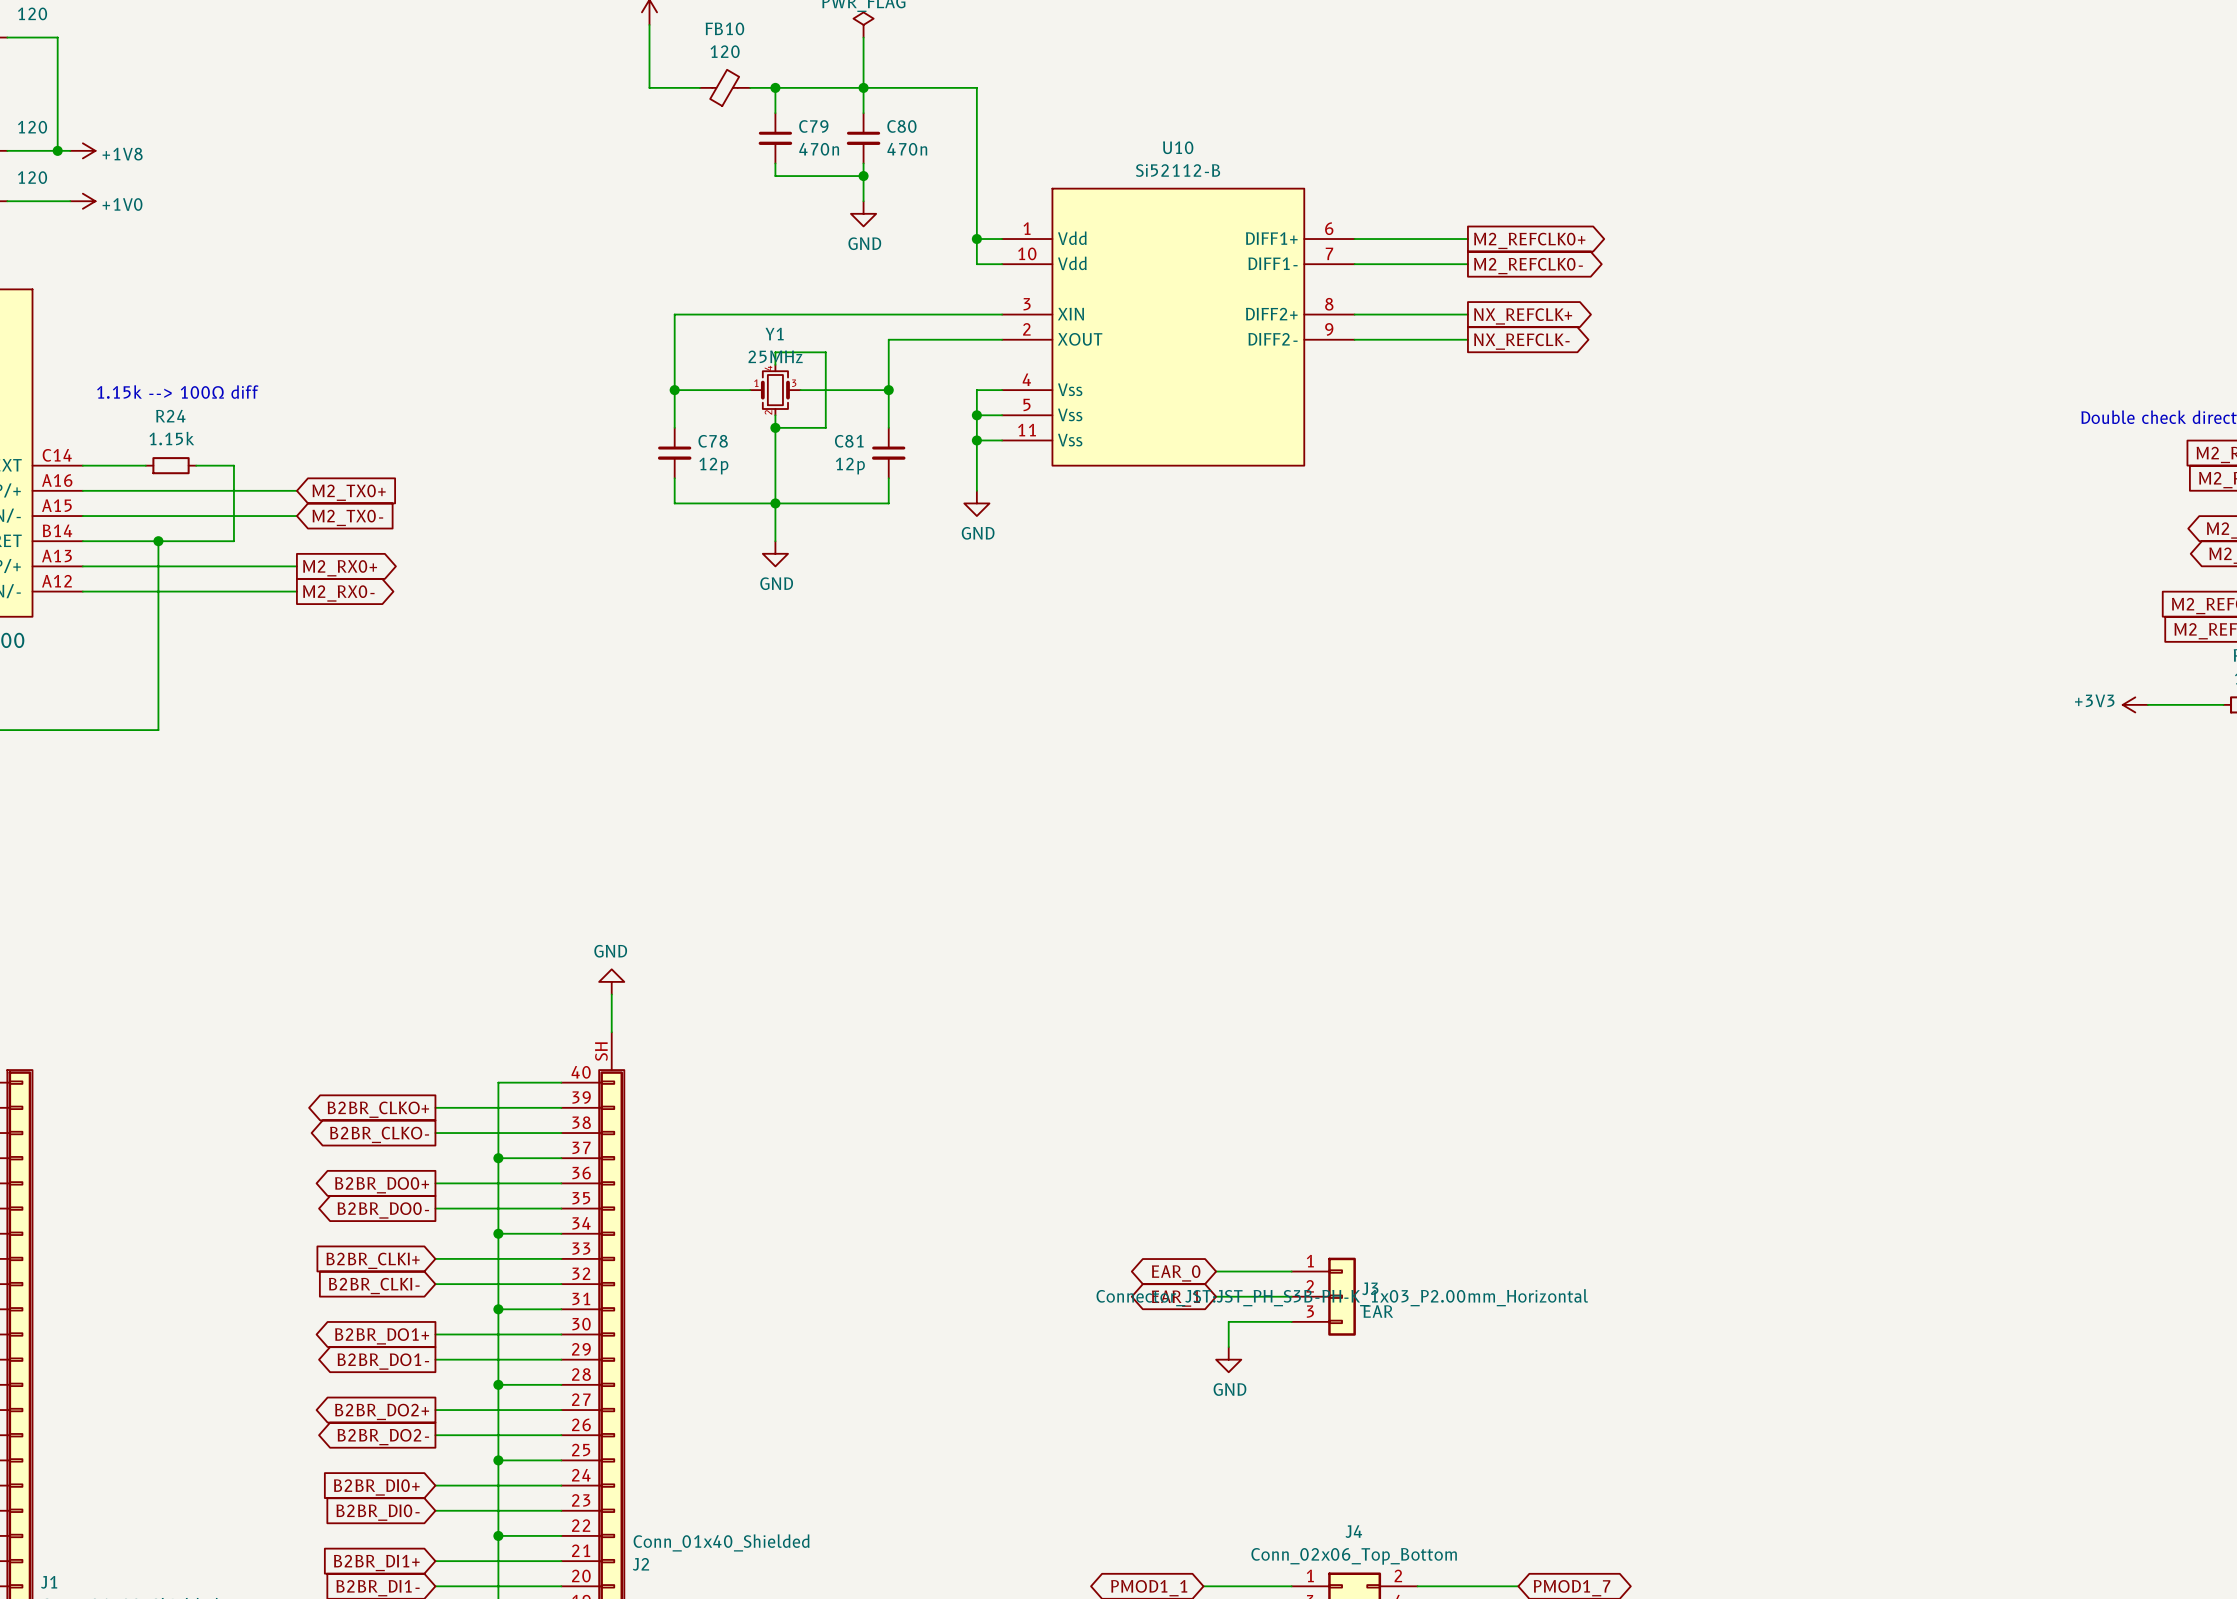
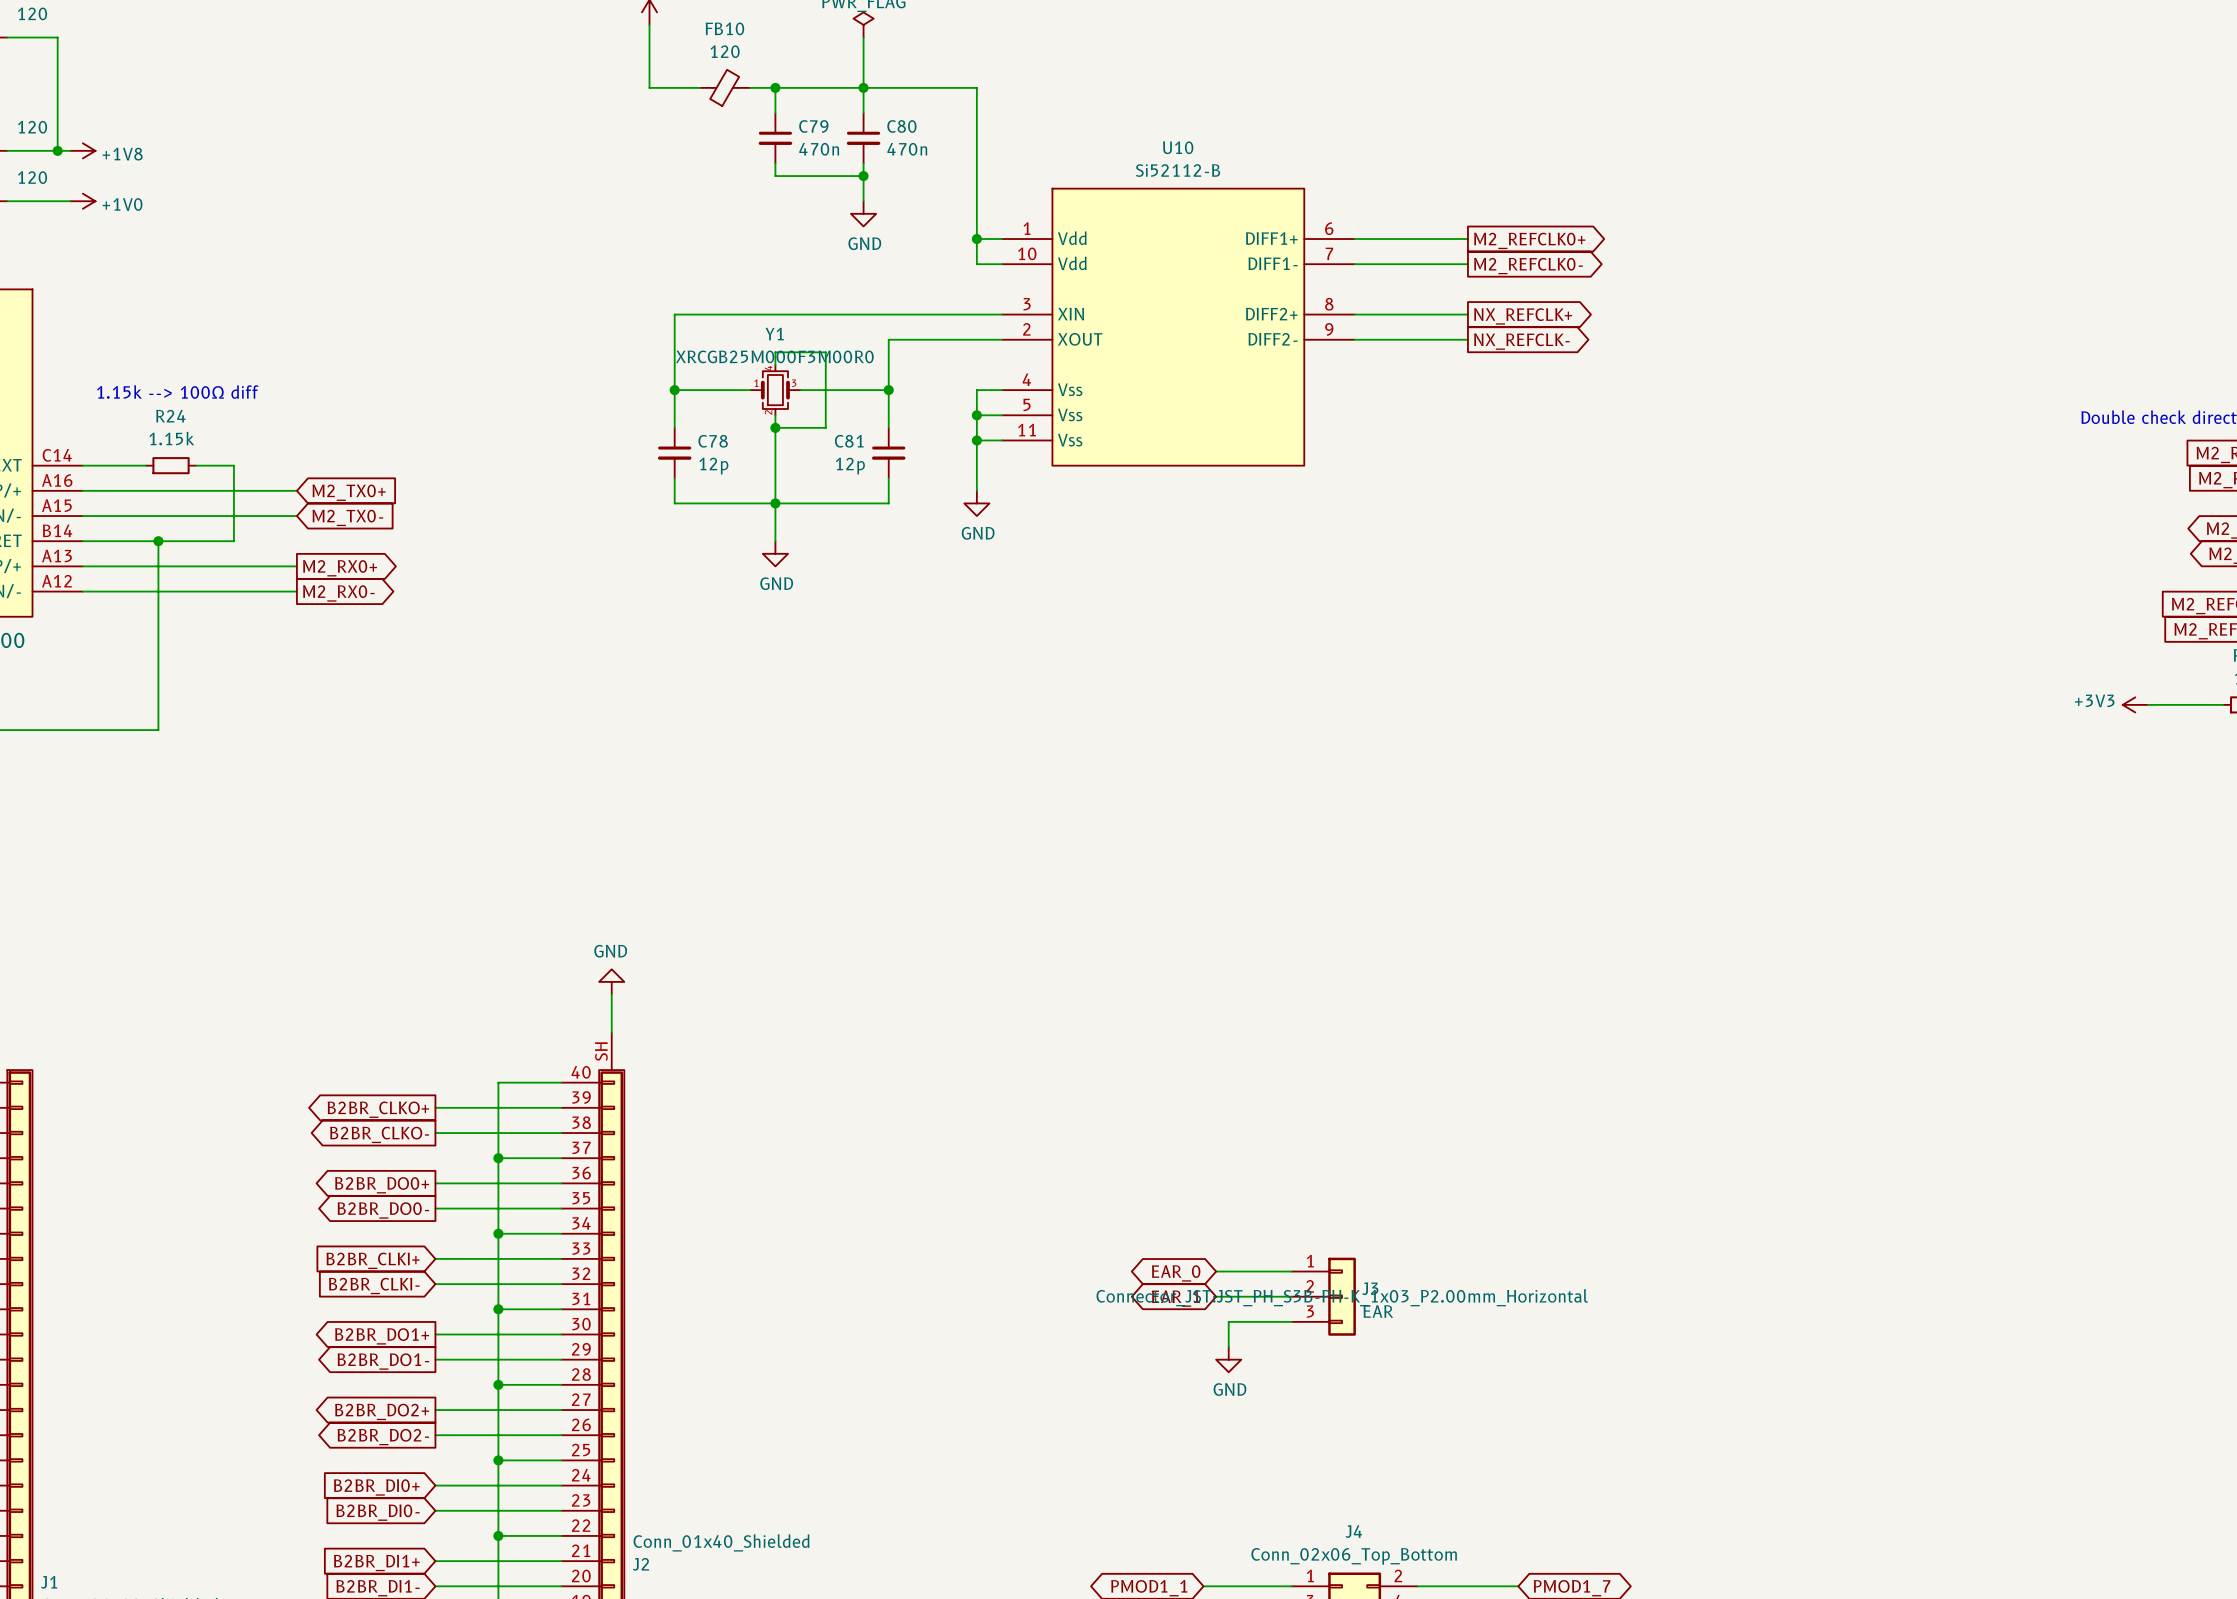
Y1 value: 25MHz (775, 356) -> XRCGB25M000F3M00R0 (774, 356)

